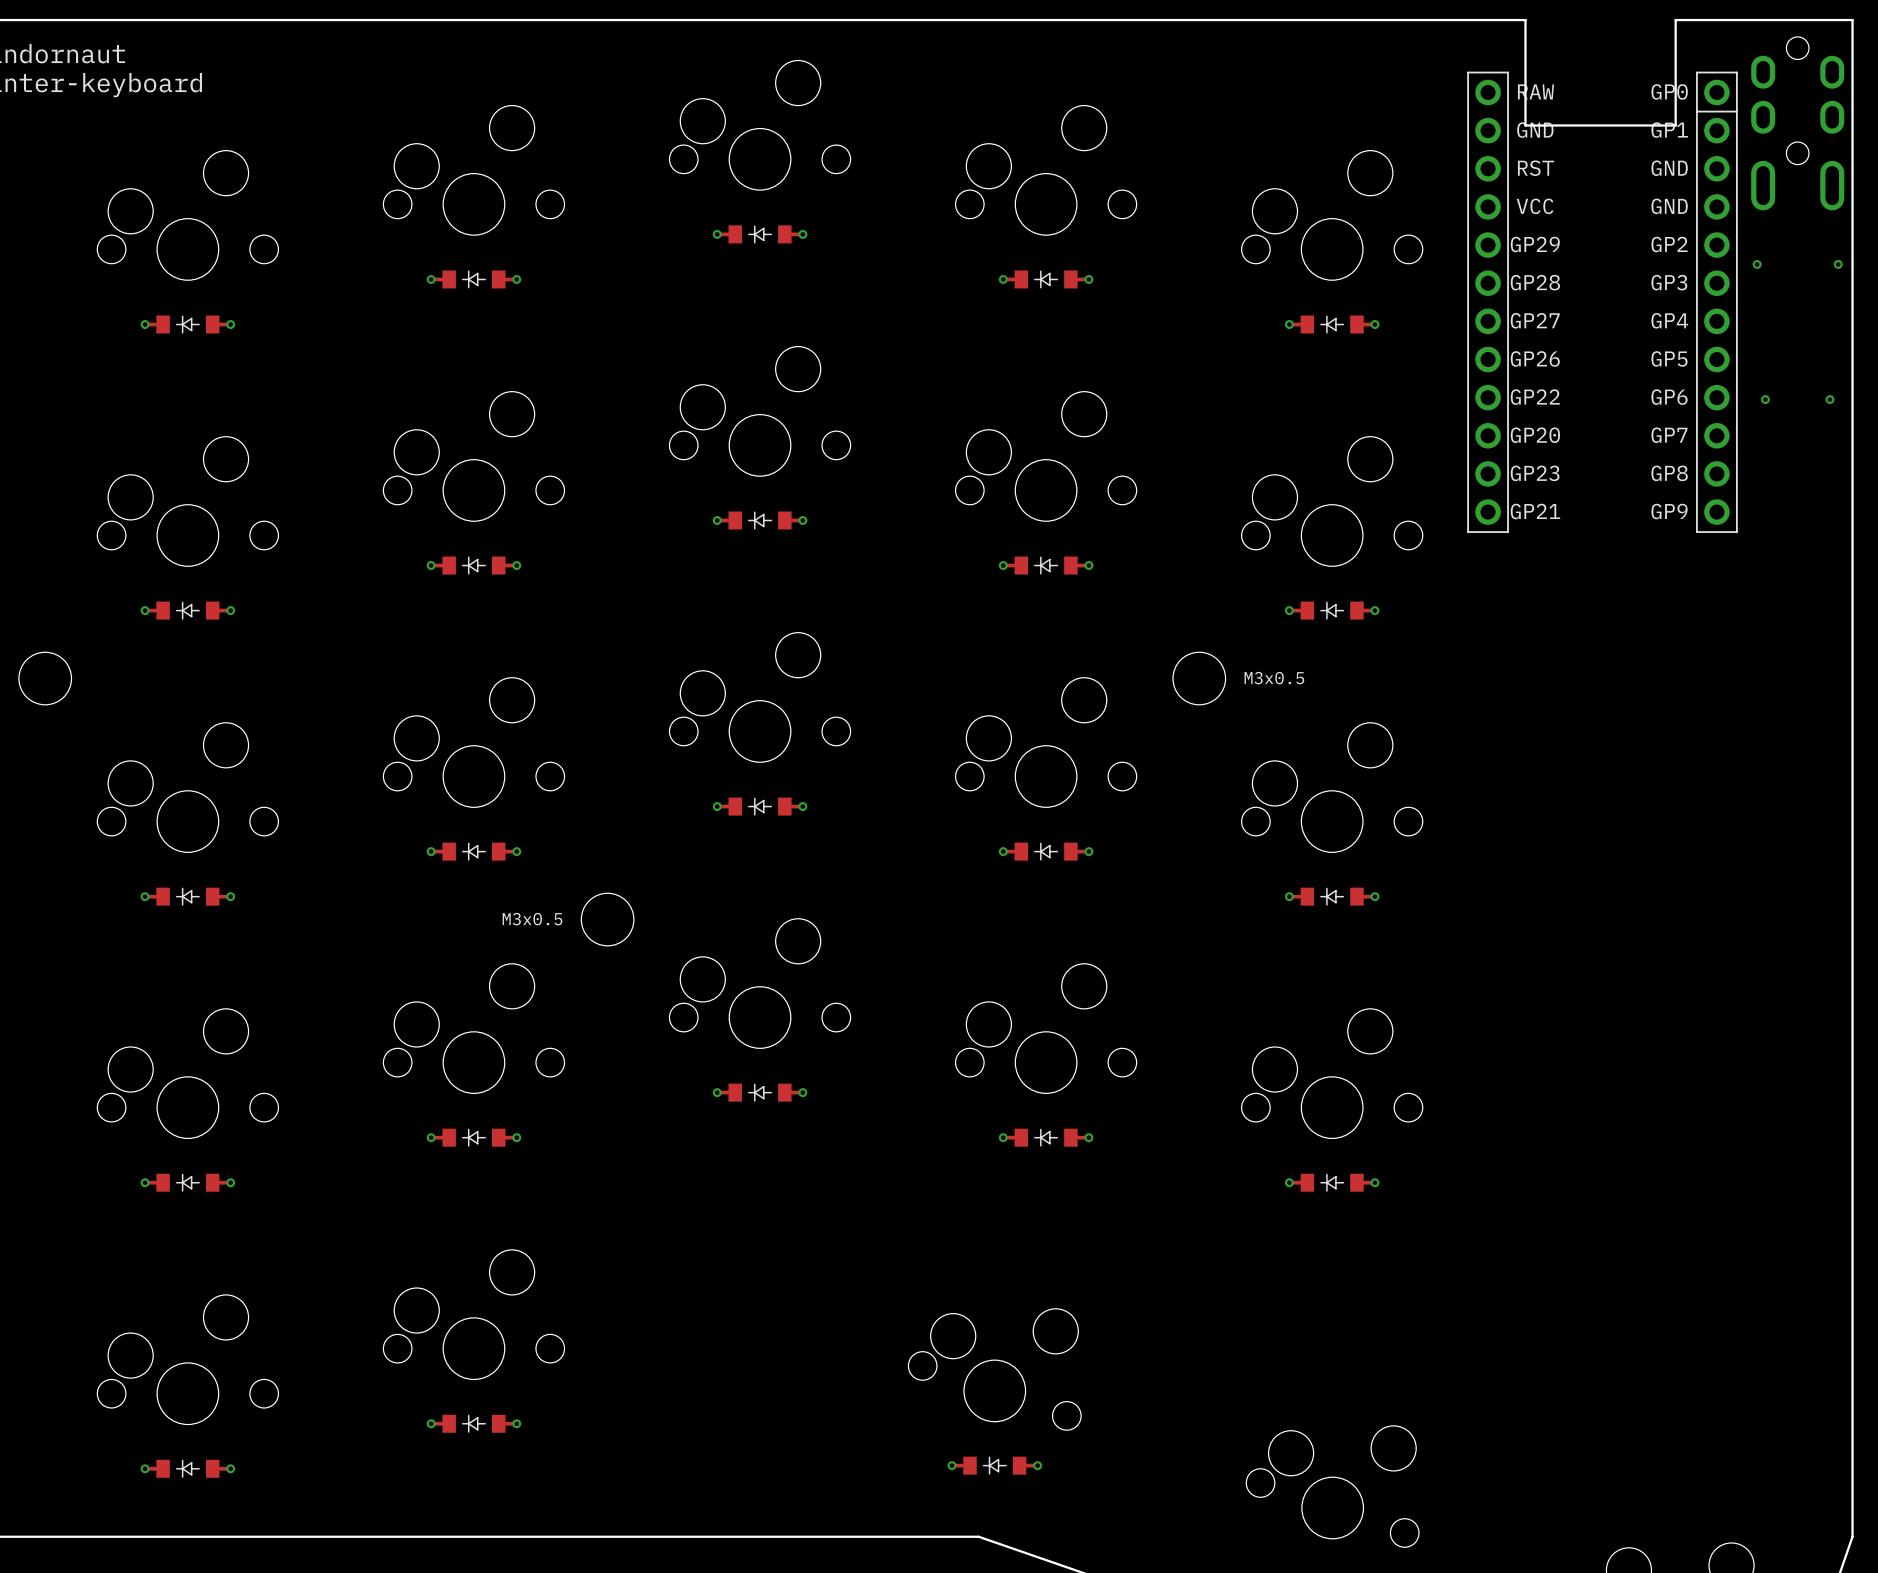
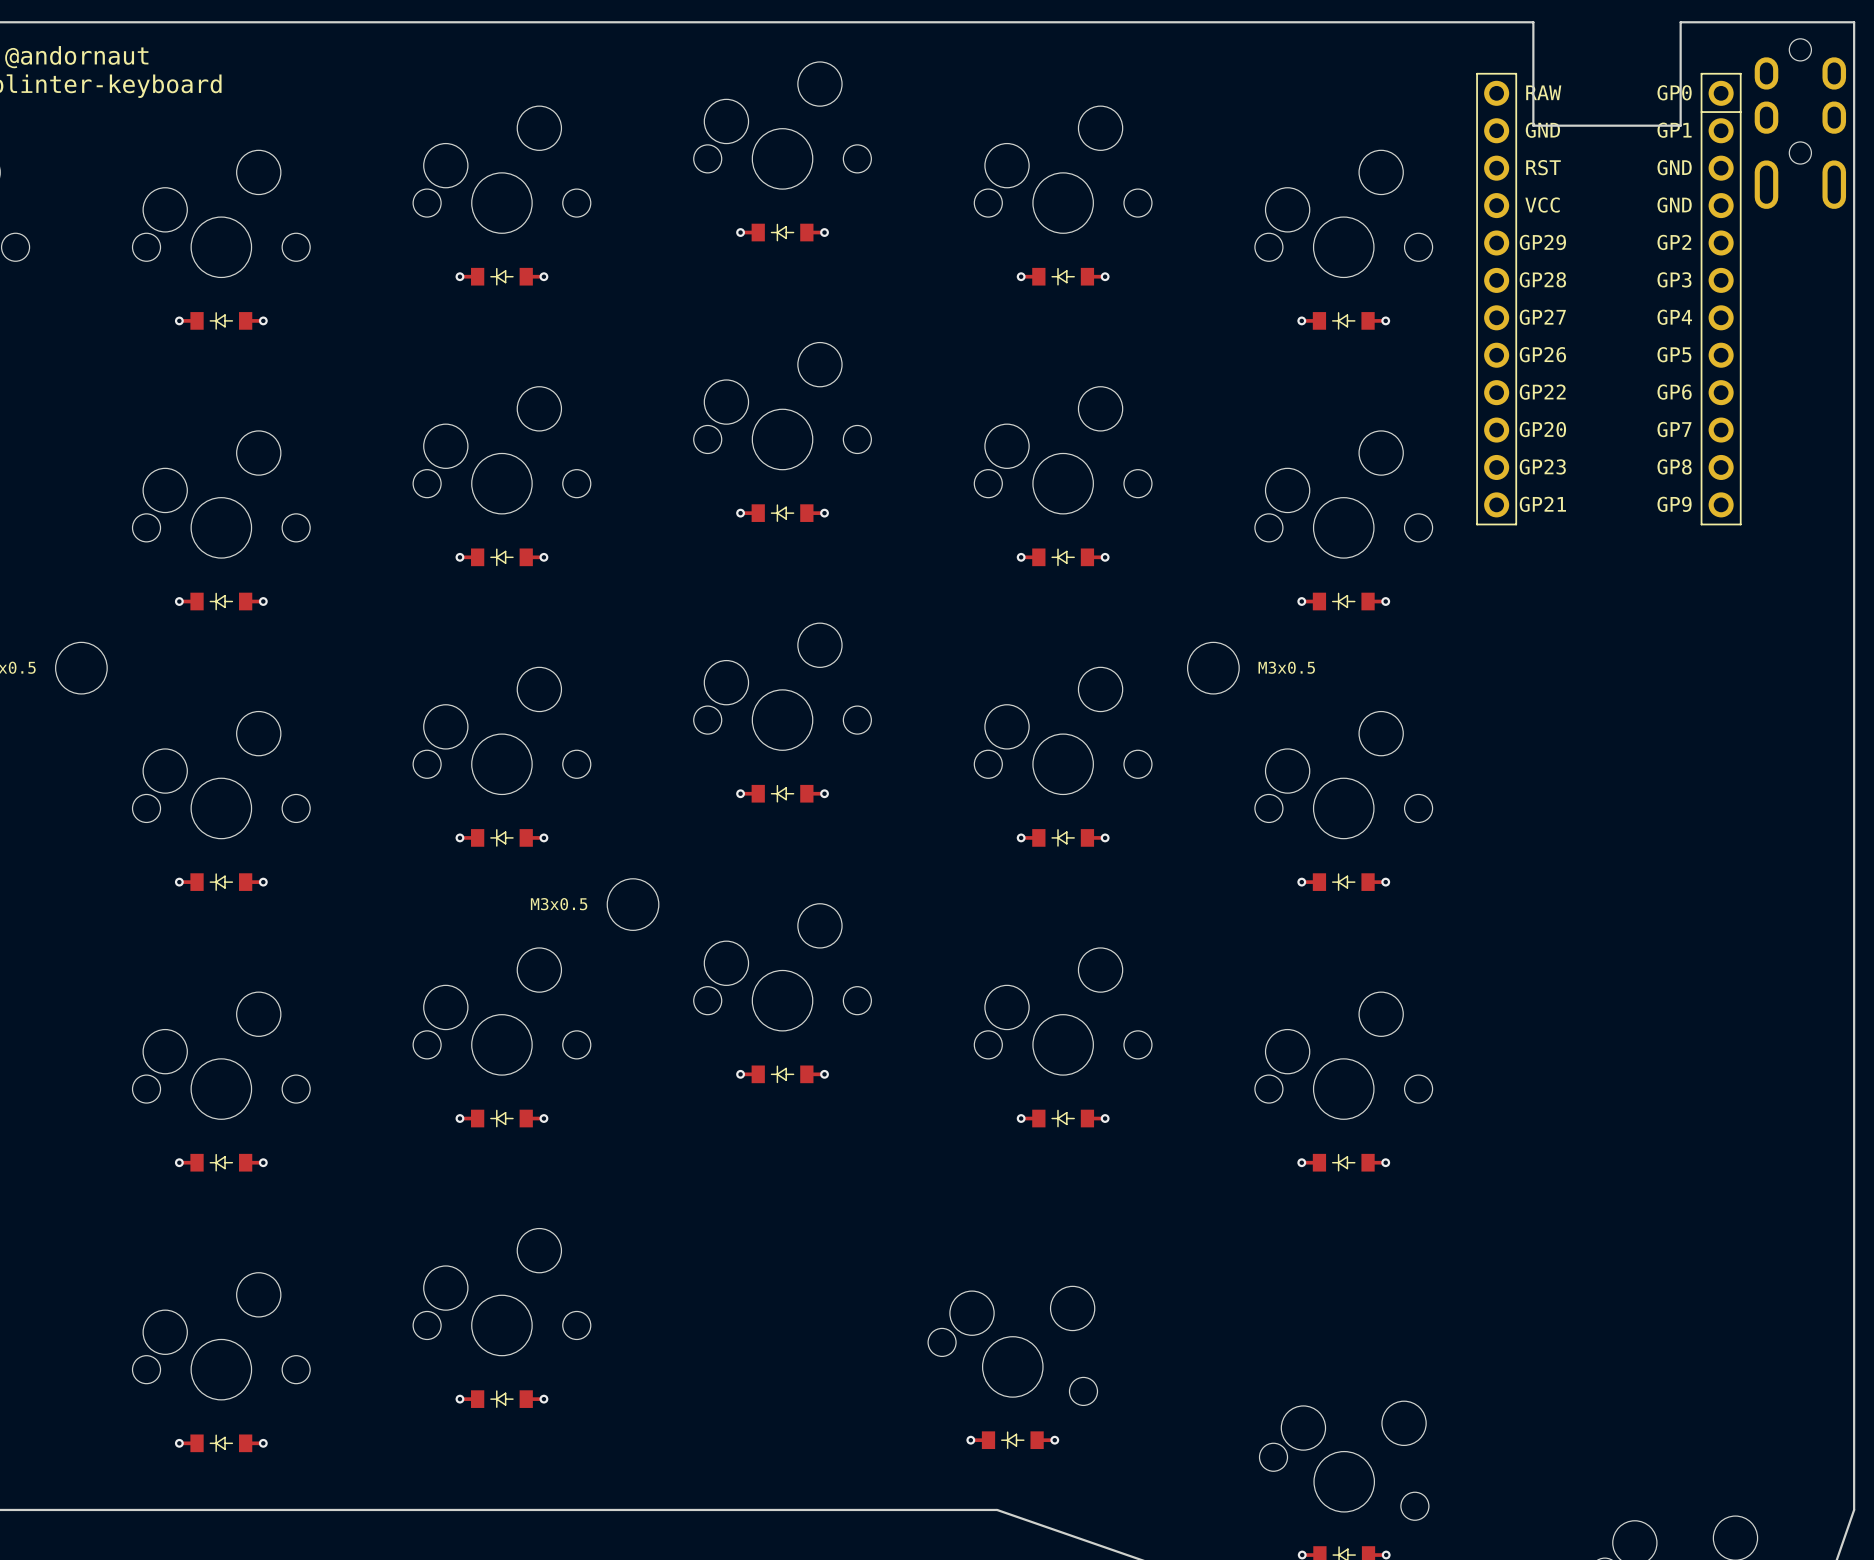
via: (1757, 264) -> none
via: (1838, 264) -> none
via: (1765, 399) -> none
via: (1829, 399) -> none

